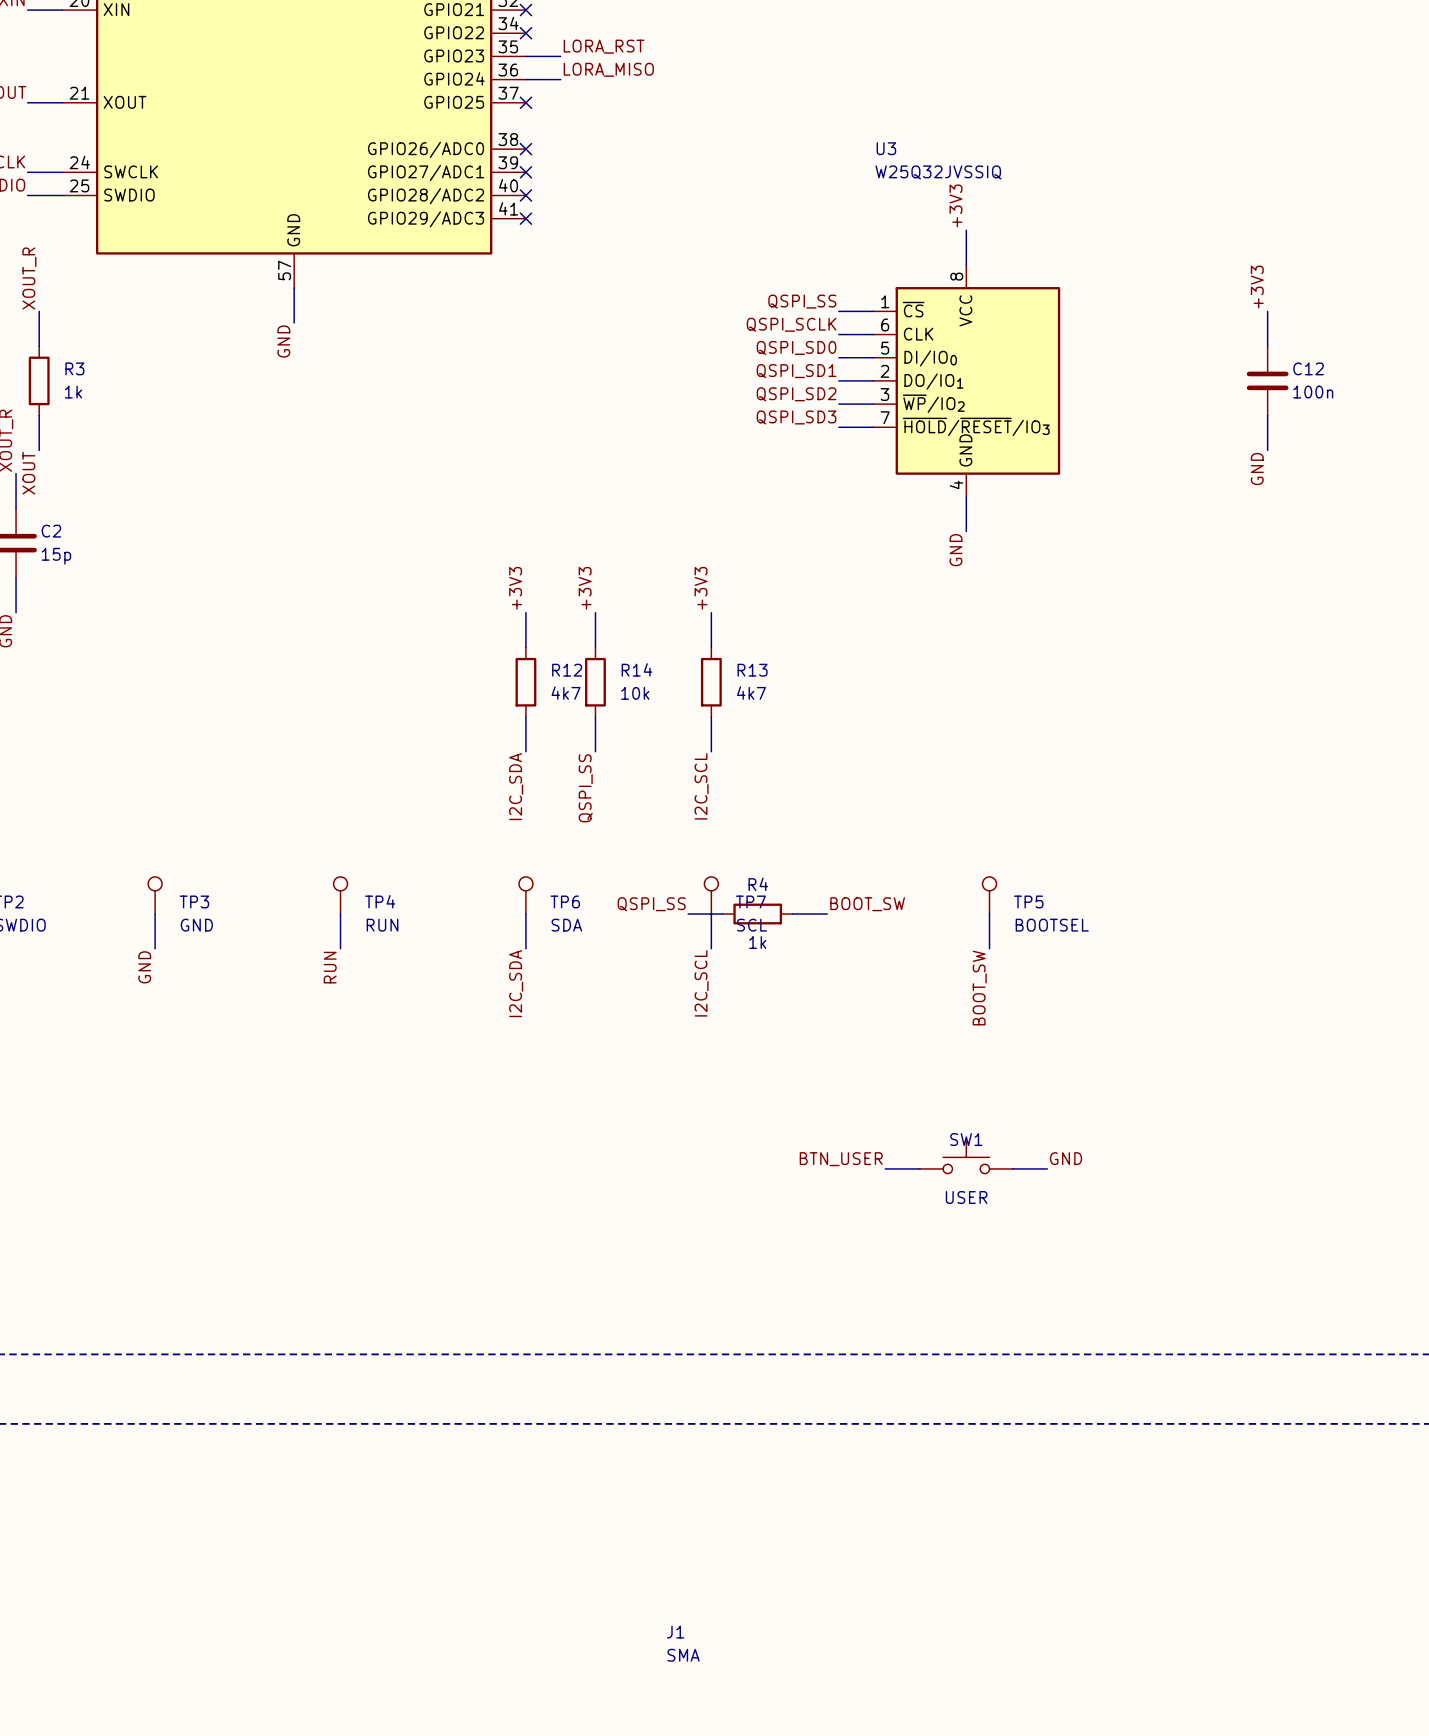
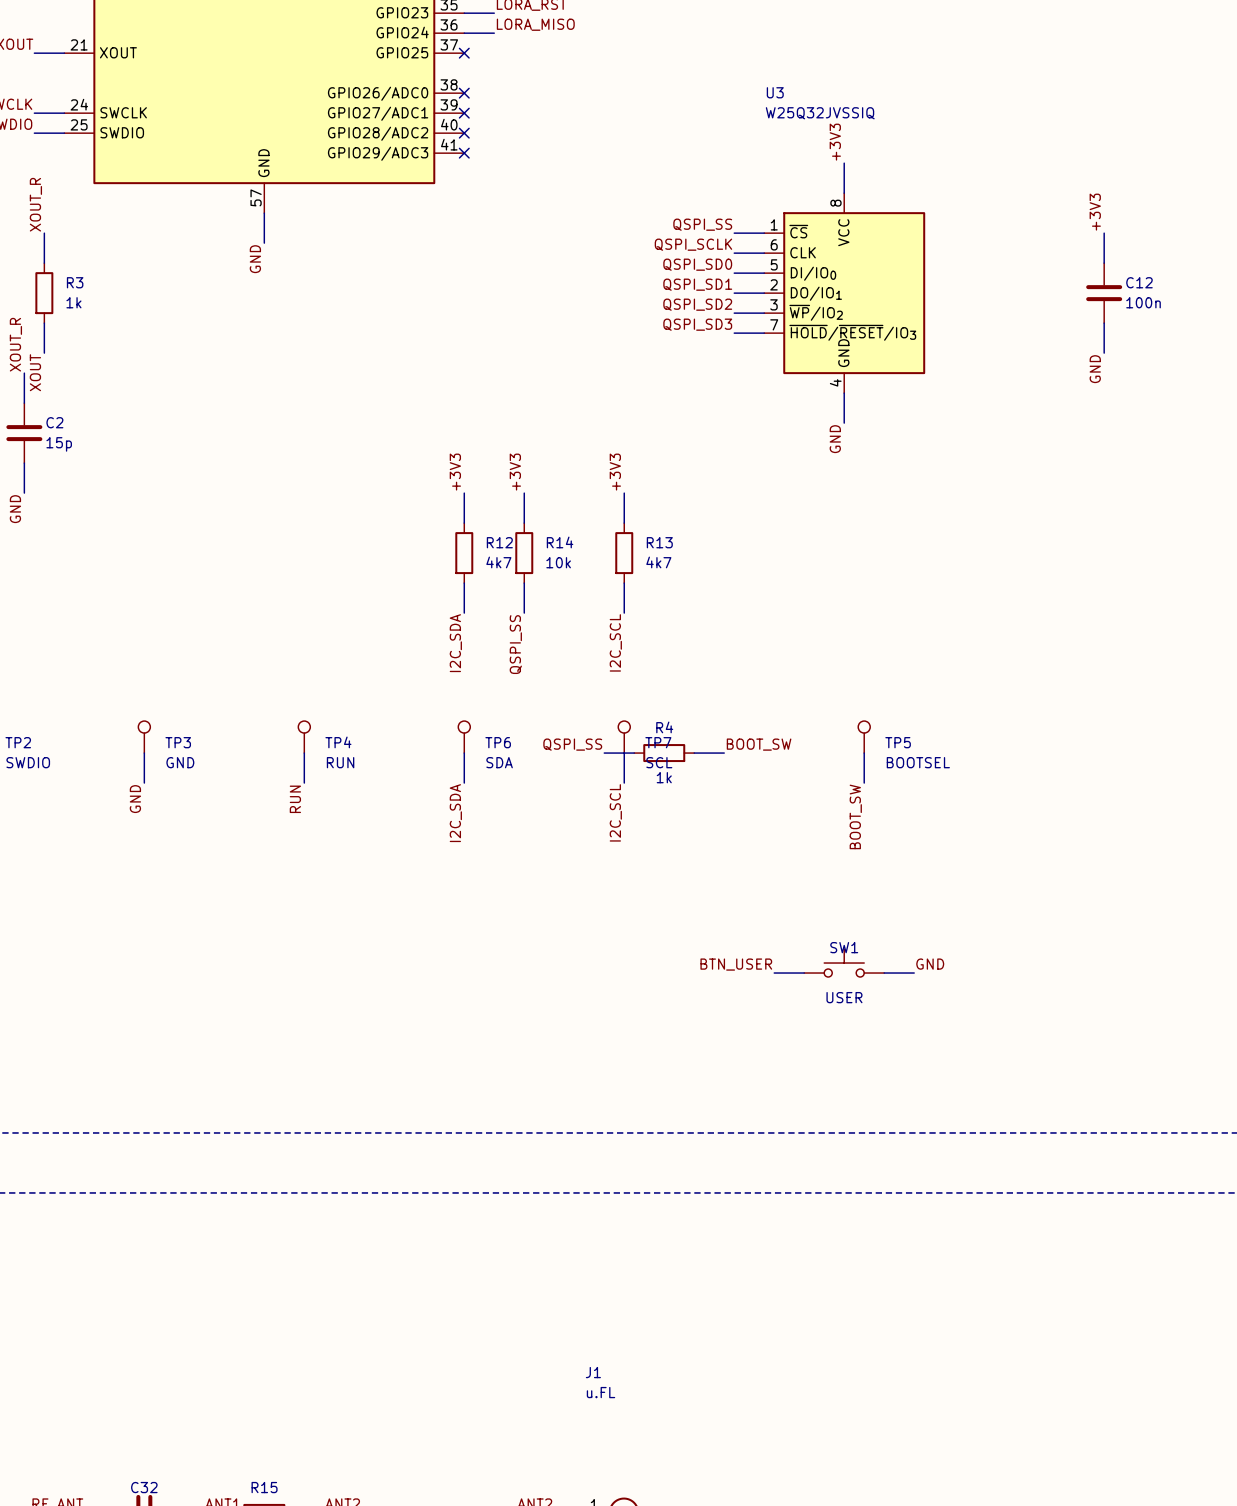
J1 value: SMA (683, 1655) -> u.FL (601, 1392)

